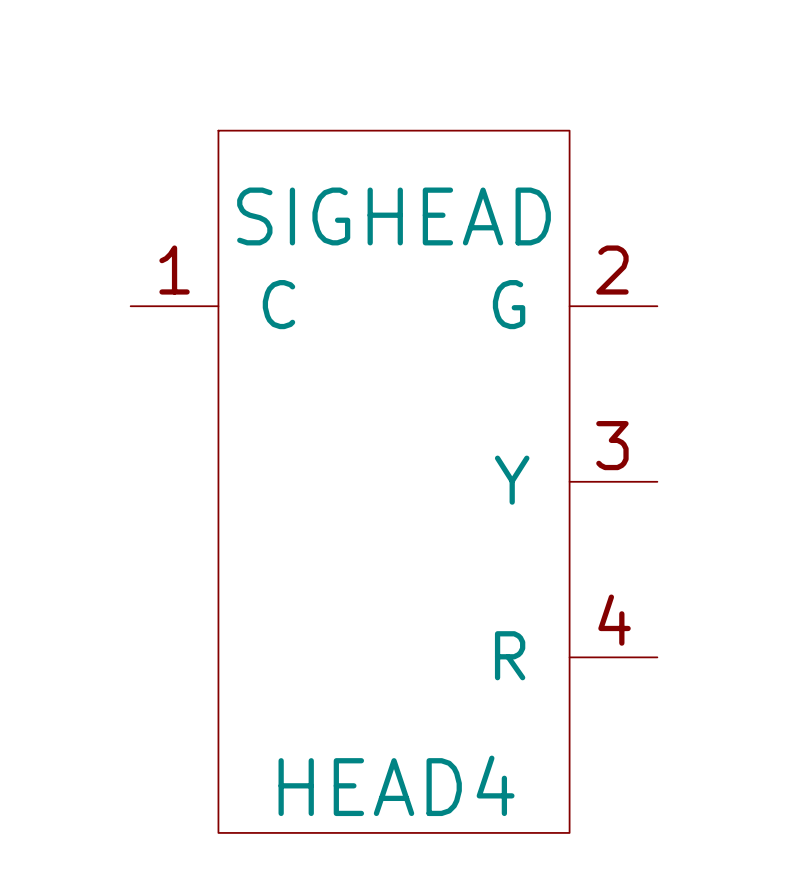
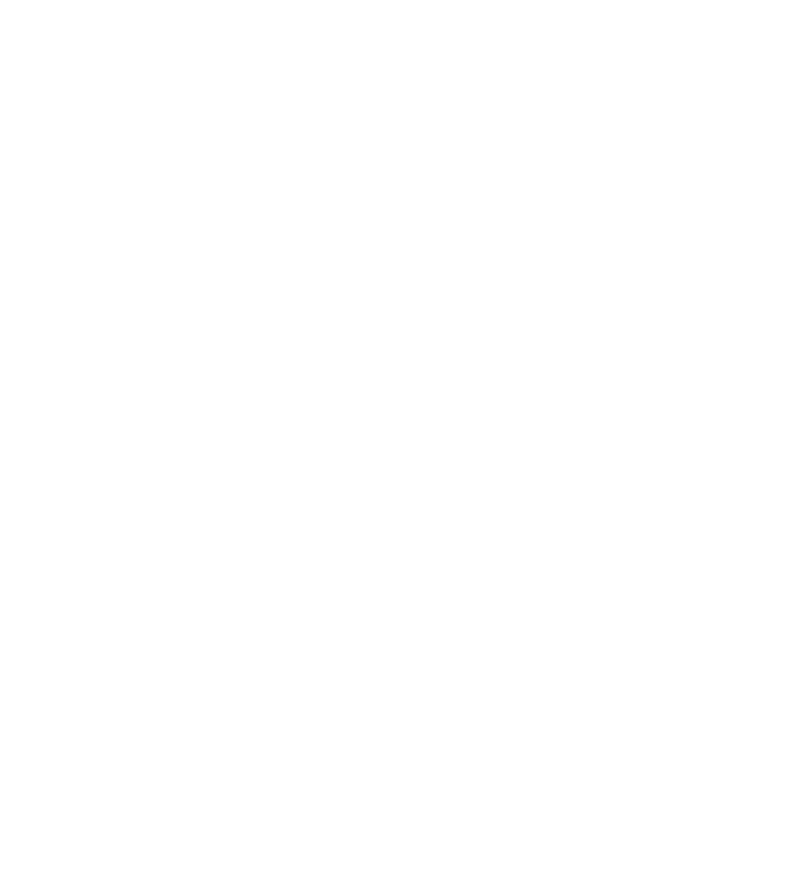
HEAD4: SIGHEAD (394, 481) -> none

